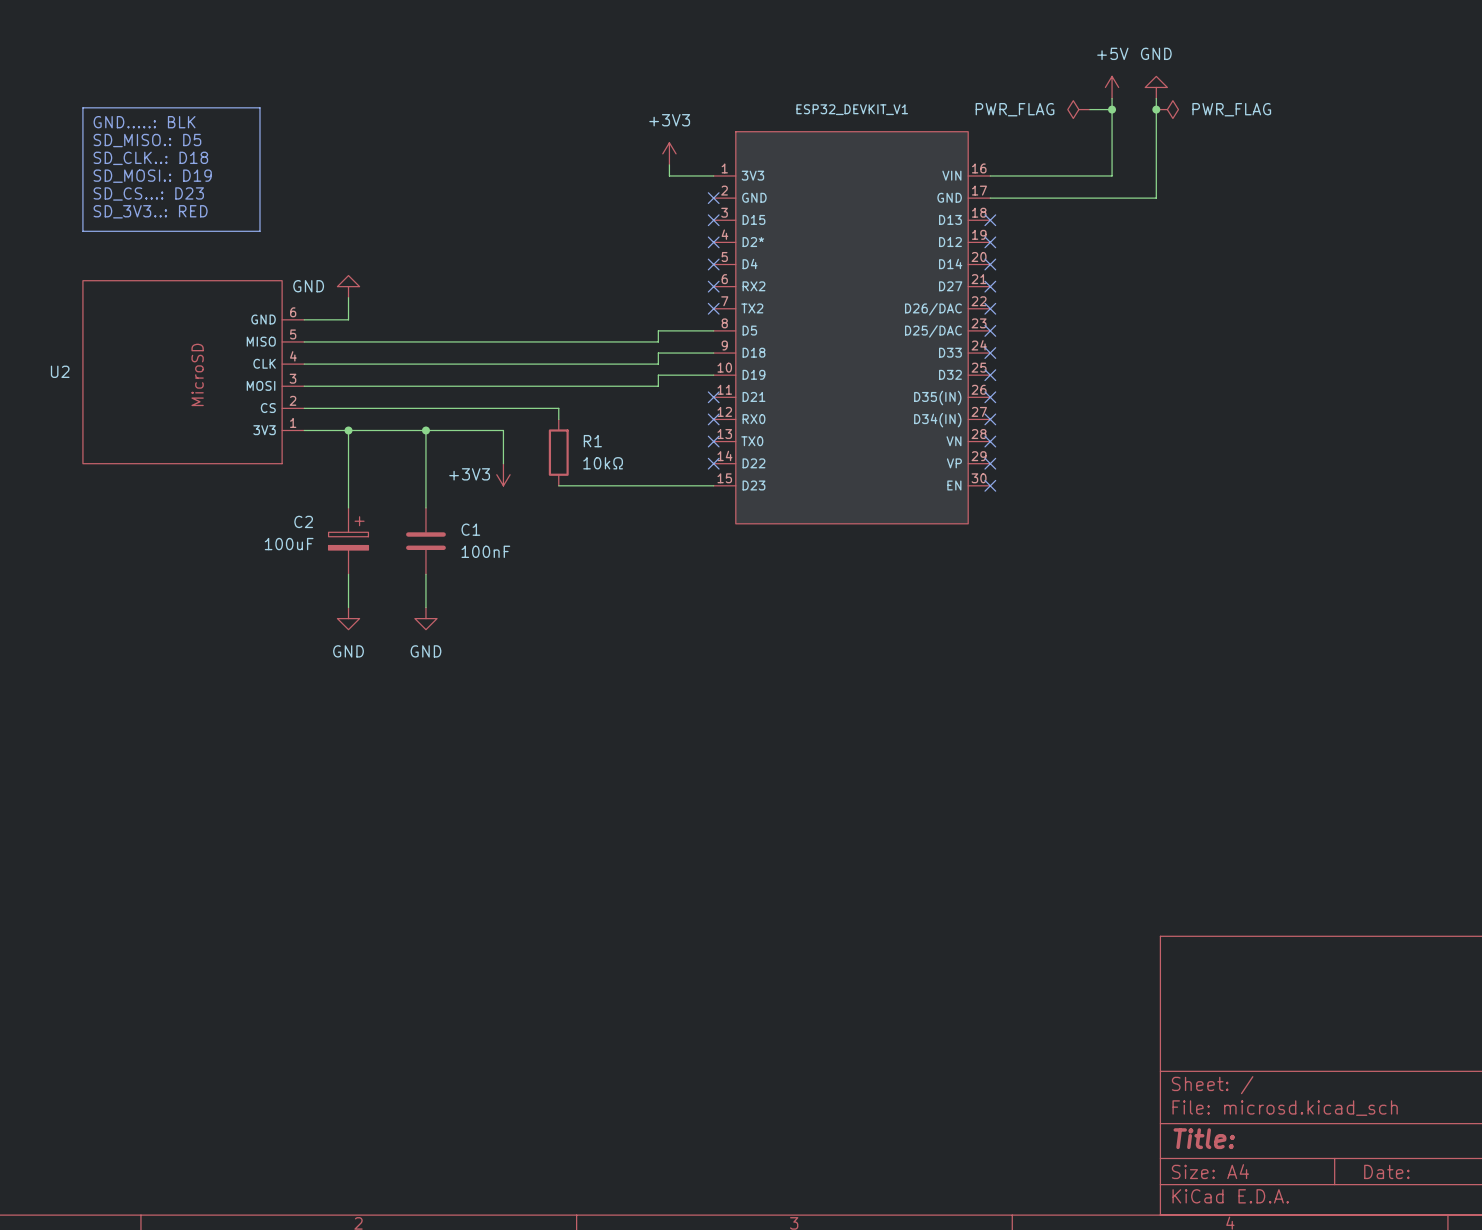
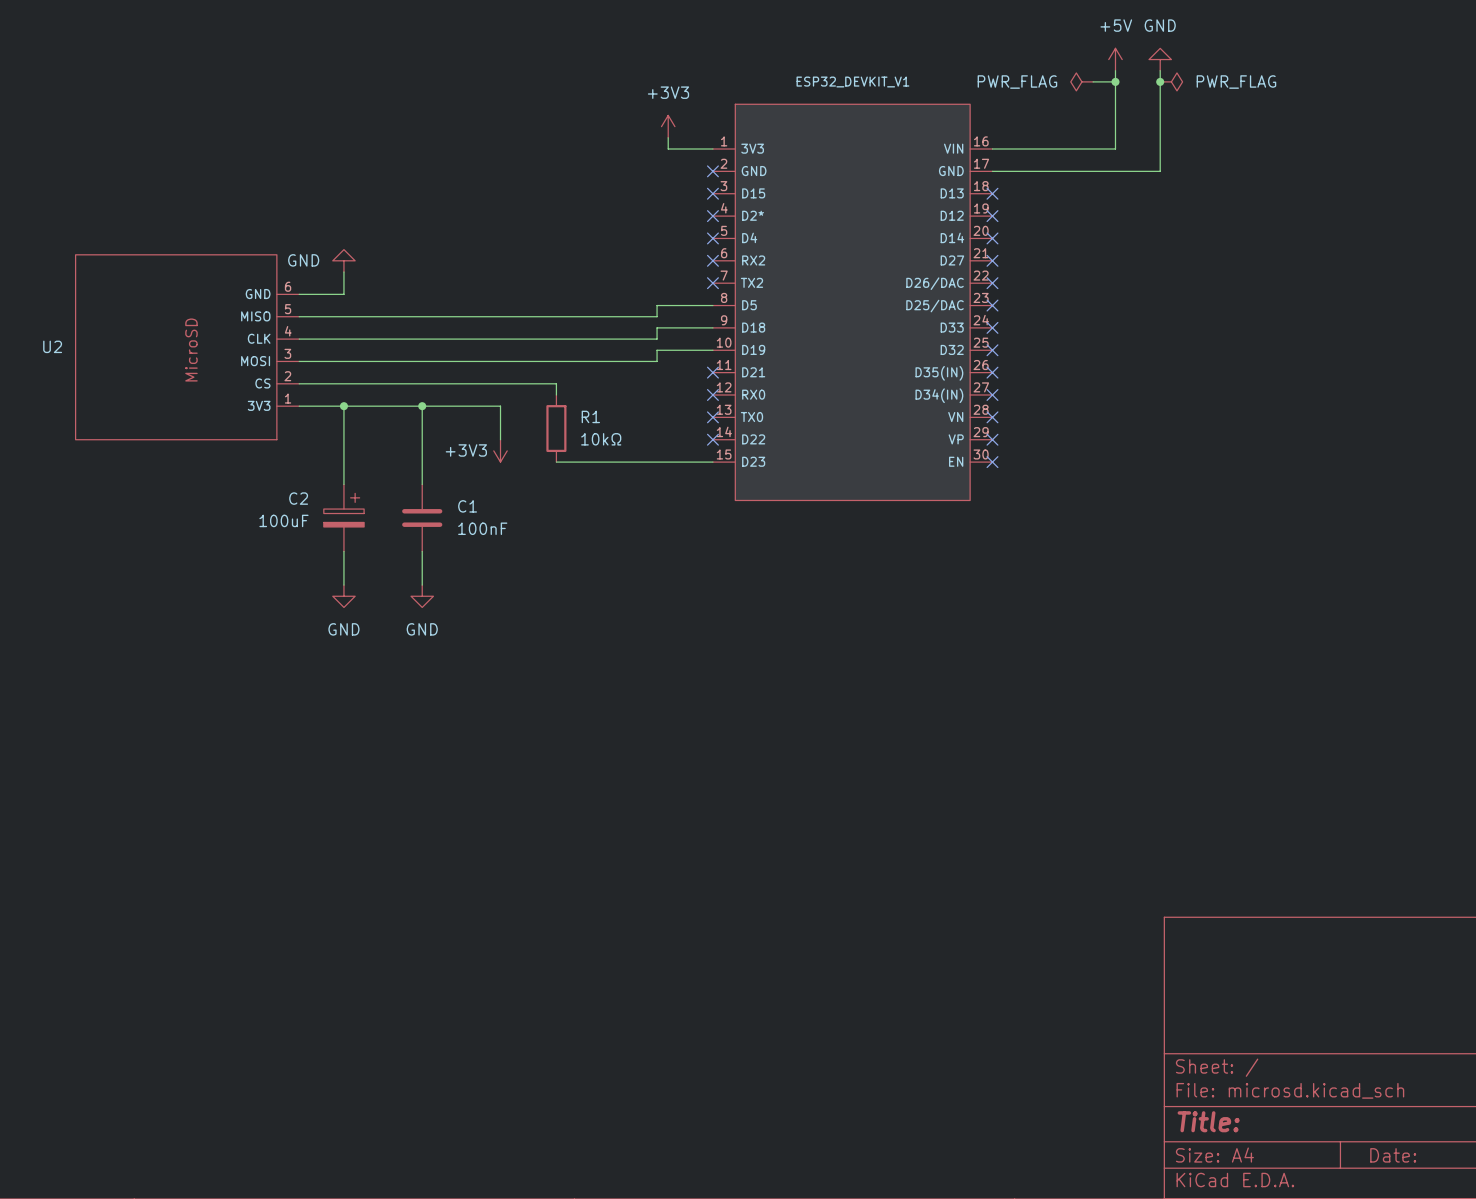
line: (82, 107) (259, 107) (259, 231) (82, 231) (82, 107) -> none
text: GND.....: BLK (144, 122) -> none
text: SD_MISO.: D5 (147, 140) -> none
text: SD_CLK..: D18 (150, 158) -> none
text: SD_MOSI.: D19 (152, 176) -> none
text: SD_CS...: D23 (148, 193) -> none
text: SD_3V3..: RED (150, 211) -> none

